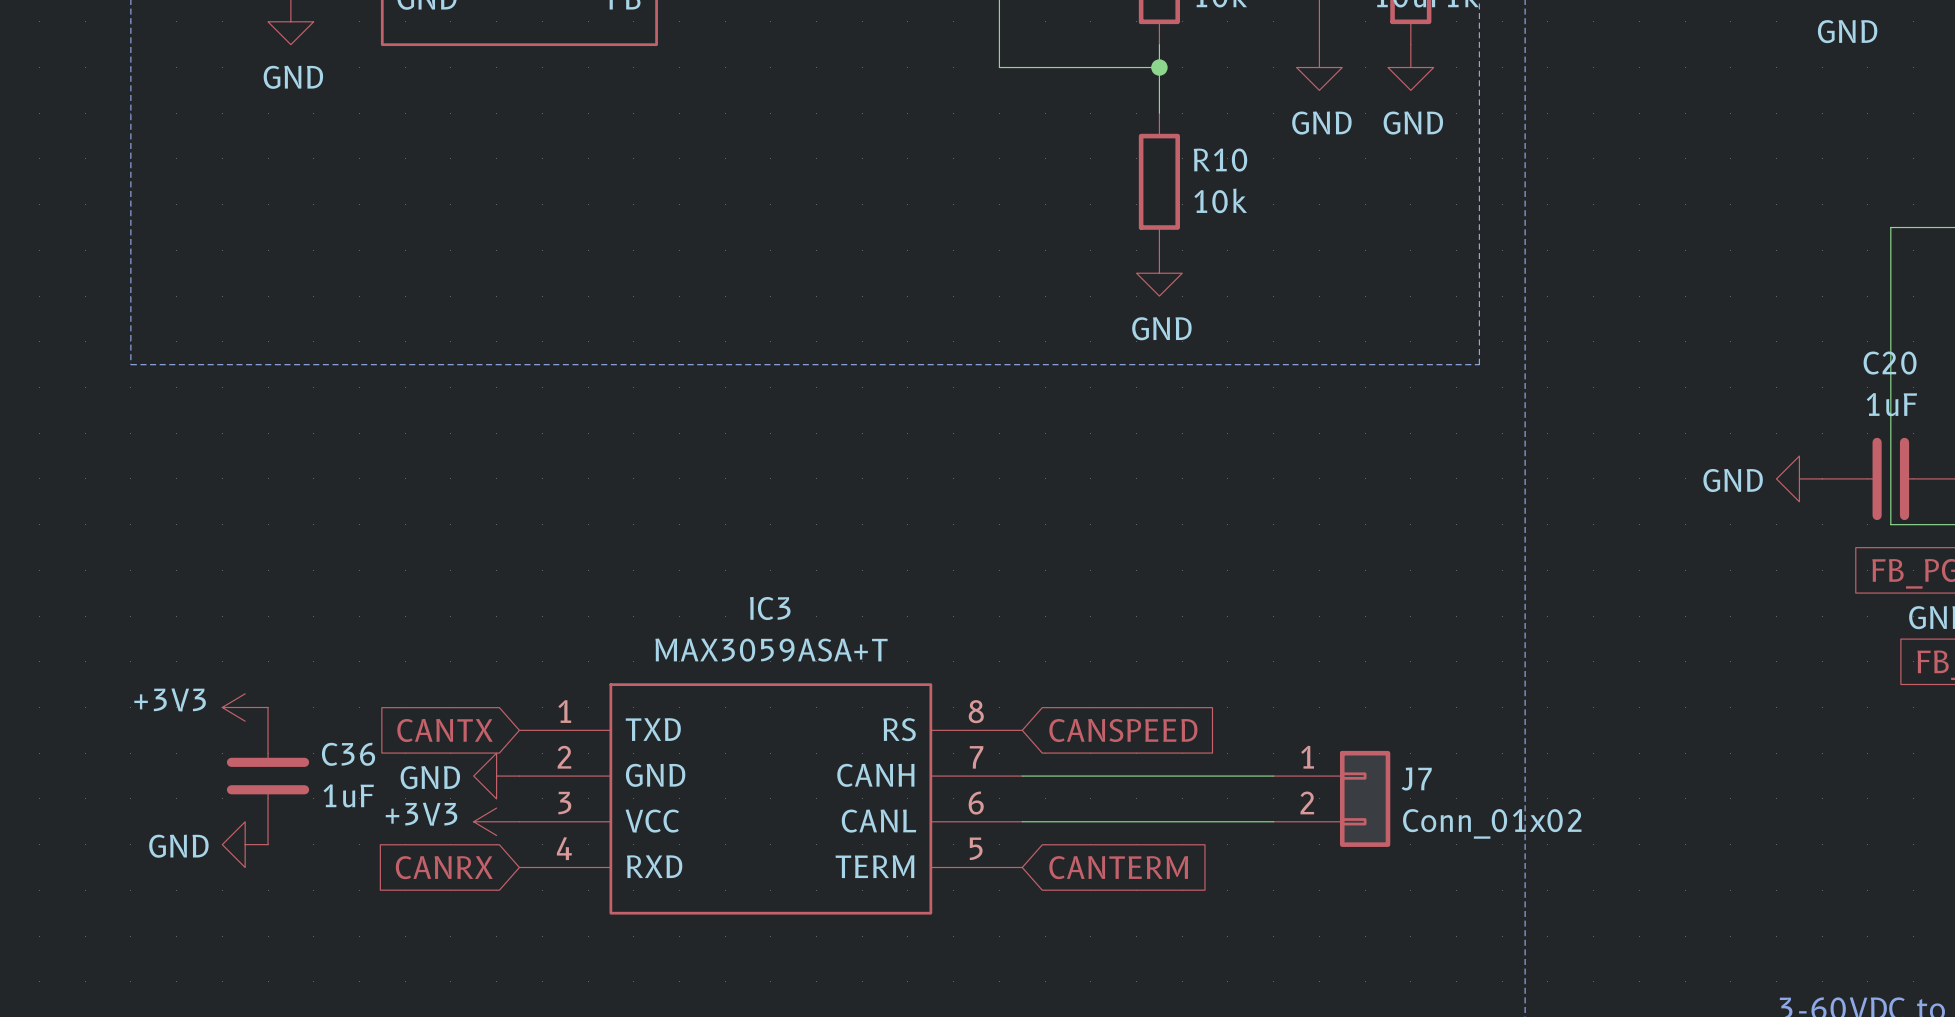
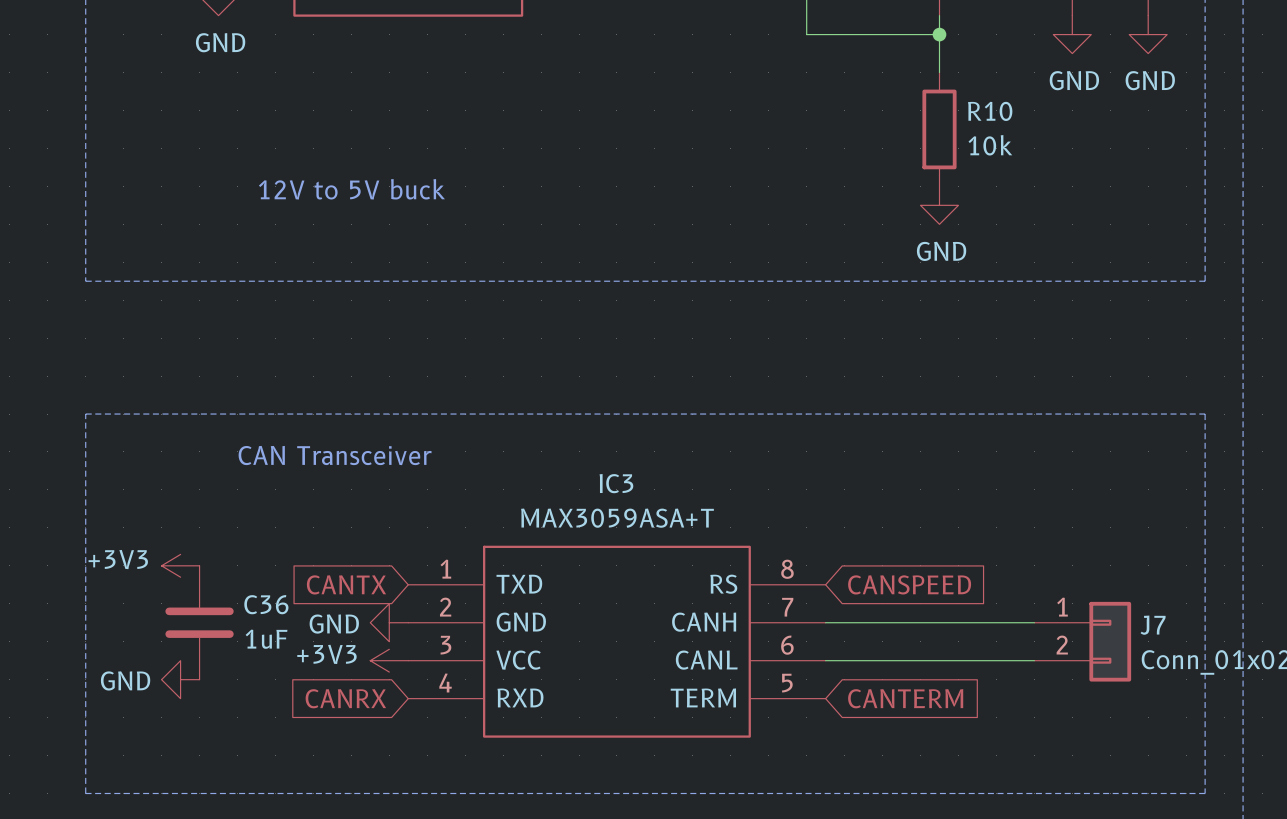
text: none -> 12V to 5V buck (351, 189)
line: none -> (85, 414) (1205, 414) (1205, 793) (85, 793) (85, 414)
text: none -> CAN Transceiver (335, 455)

